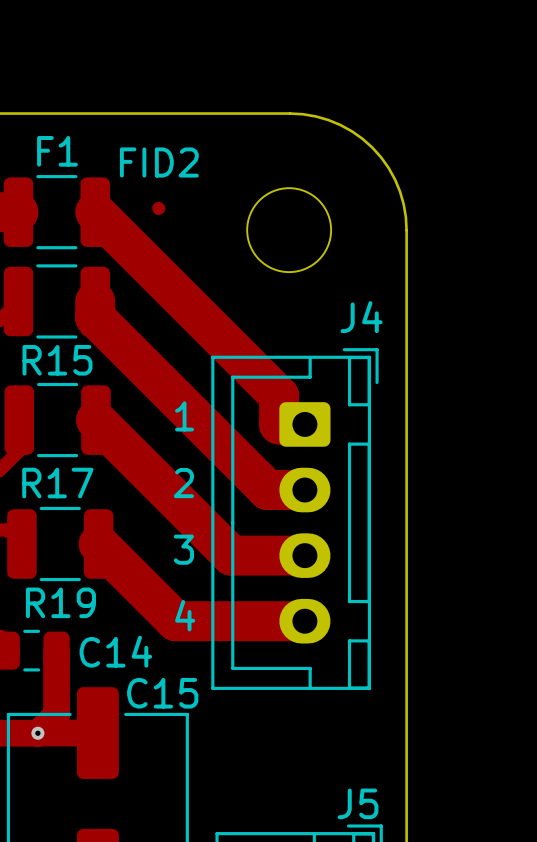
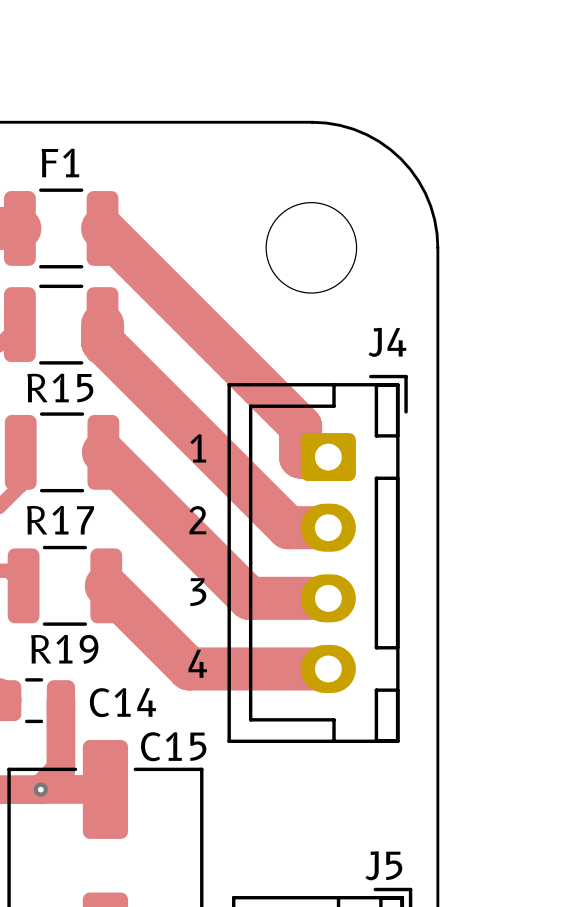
FID2: (158, 208) -> none

